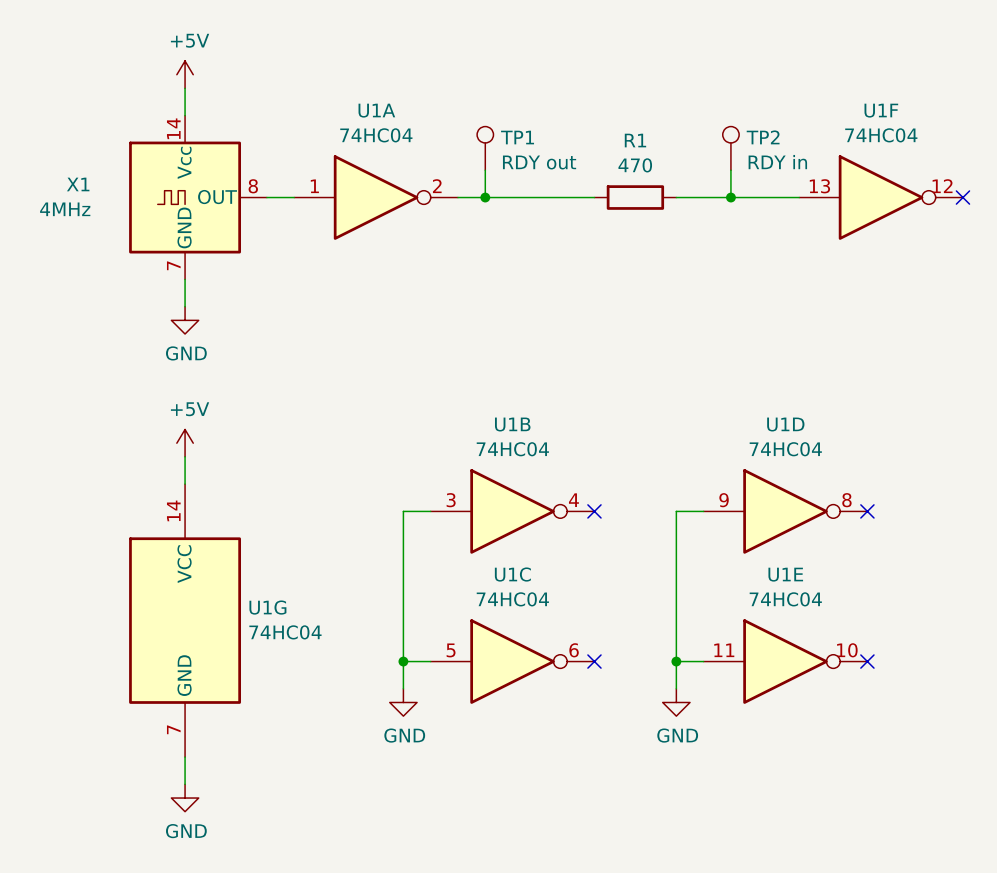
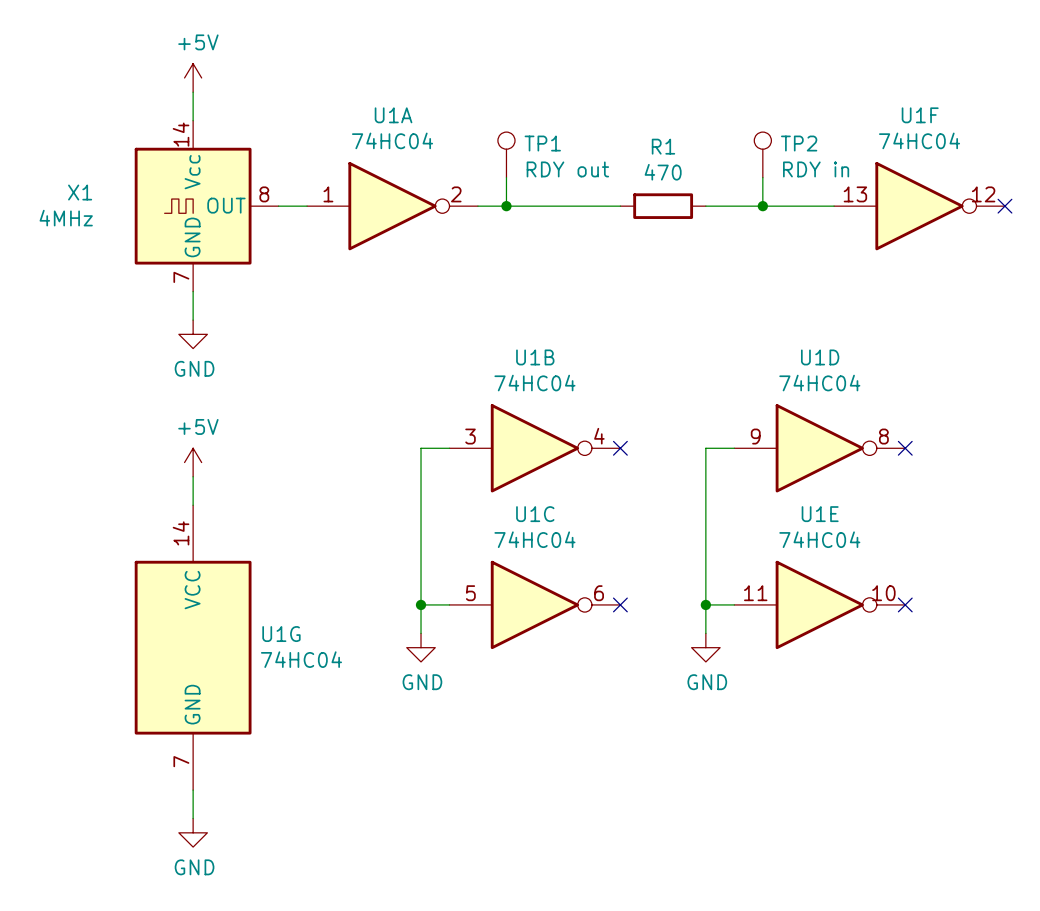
no-connect mark: none -> (620, 448)
no-connect mark: none -> (905, 448)
wire: (403, 511) (430, 511) -> (421, 533) (421, 448) (449, 448)
U1B position: (512, 511) -> (534, 448)
no-connect mark: (594, 511) -> none
wire: (676, 511) (703, 511) -> (705, 533) (705, 448) (734, 448)
U1D position: (785, 511) -> (819, 448)
no-connect mark: (867, 511) -> none
junction: none -> (421, 604)
no-connect mark: none -> (620, 604)
junction: none -> (705, 604)
no-connect mark: none -> (905, 604)
wire: (403, 606) (403, 688) -> none
wire: (676, 606) (676, 688) -> none
wire: (403, 661) (430, 661) -> (421, 604) (449, 604)
junction: (403, 661) -> none
U1C position: (512, 661) -> (534, 604)
no-connect mark: (594, 661) -> none
wire: (676, 661) (703, 661) -> (705, 604) (734, 604)
junction: (676, 661) -> none
U1E position: (785, 661) -> (819, 604)
no-connect mark: (867, 661) -> none
power symbol position: GND (403, 702) -> GND (421, 647)
power symbol position: GND (676, 702) -> GND (705, 647)

